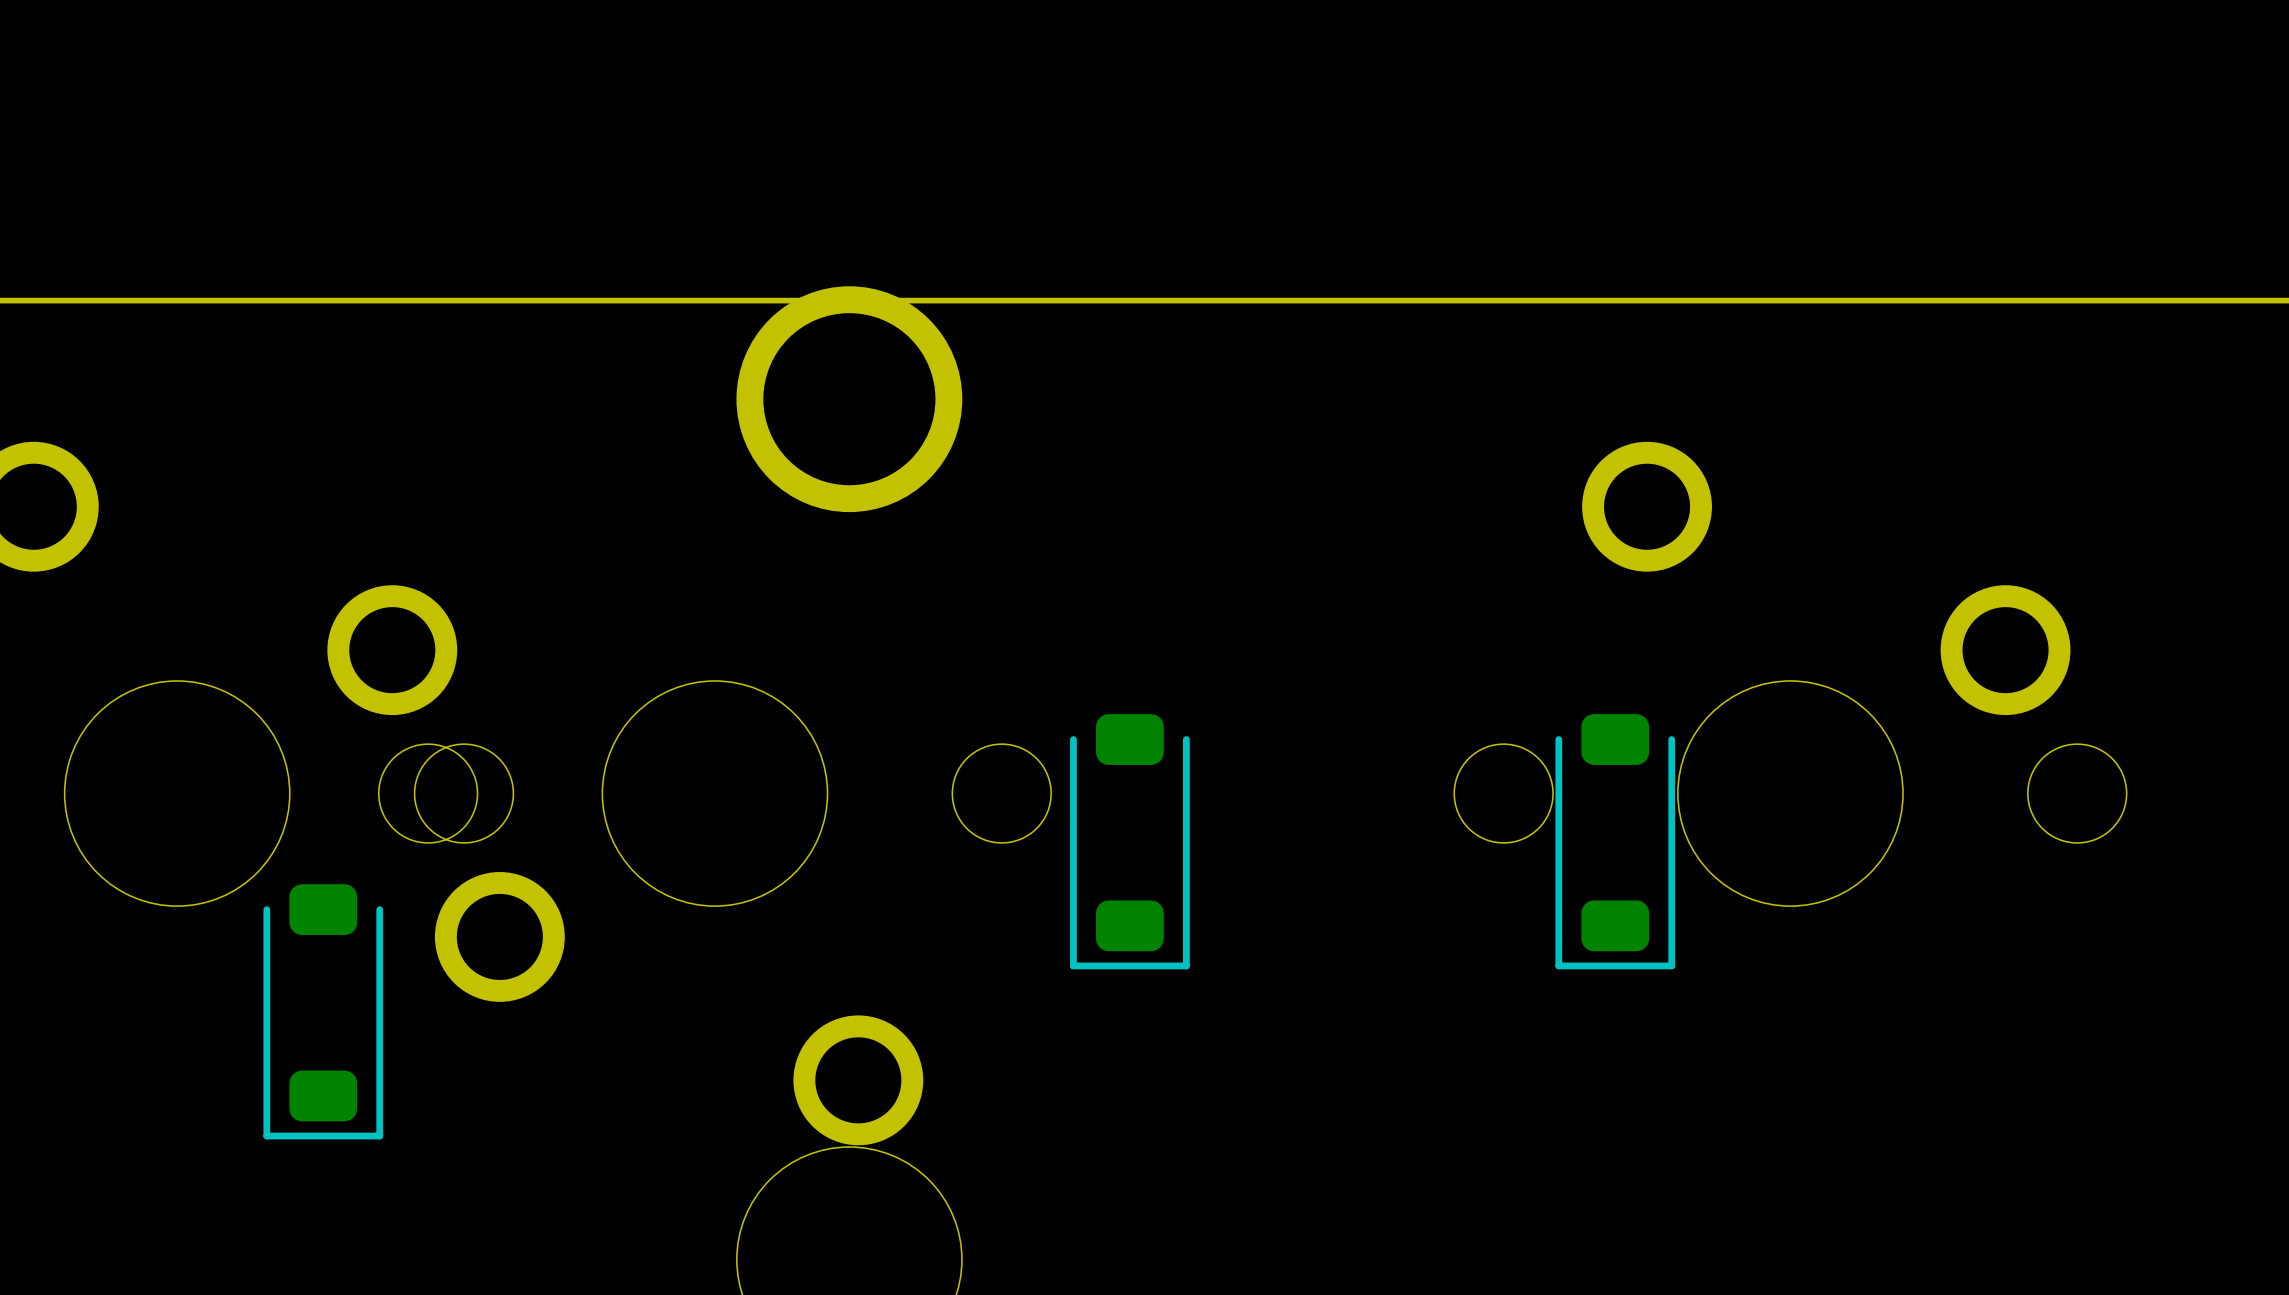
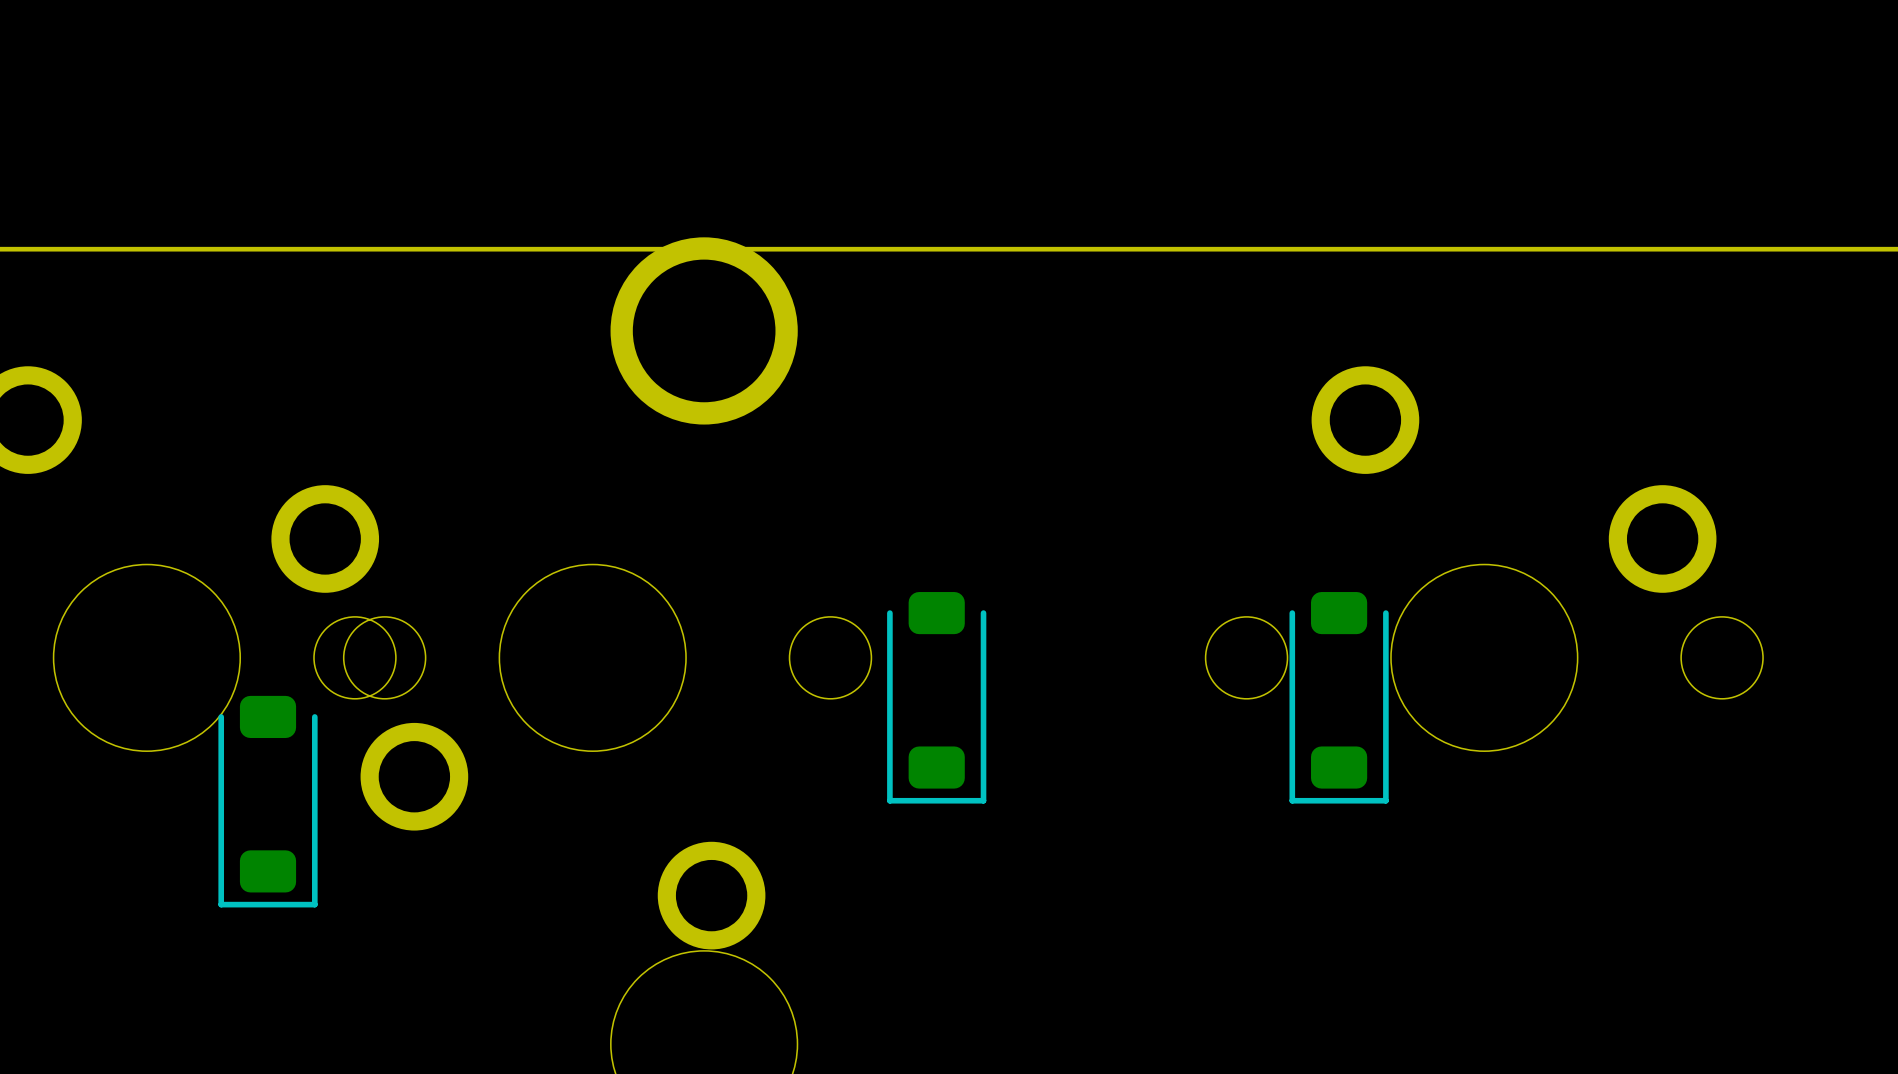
part position: (323, 1011) -> (268, 801)

